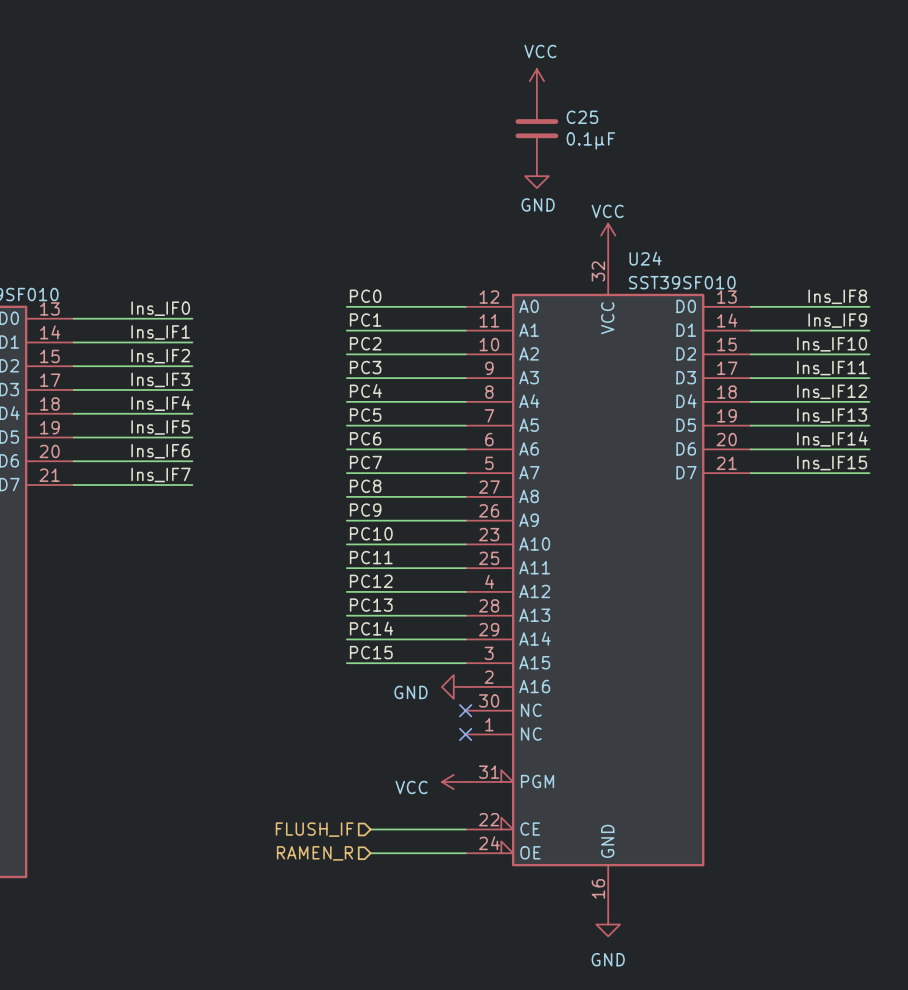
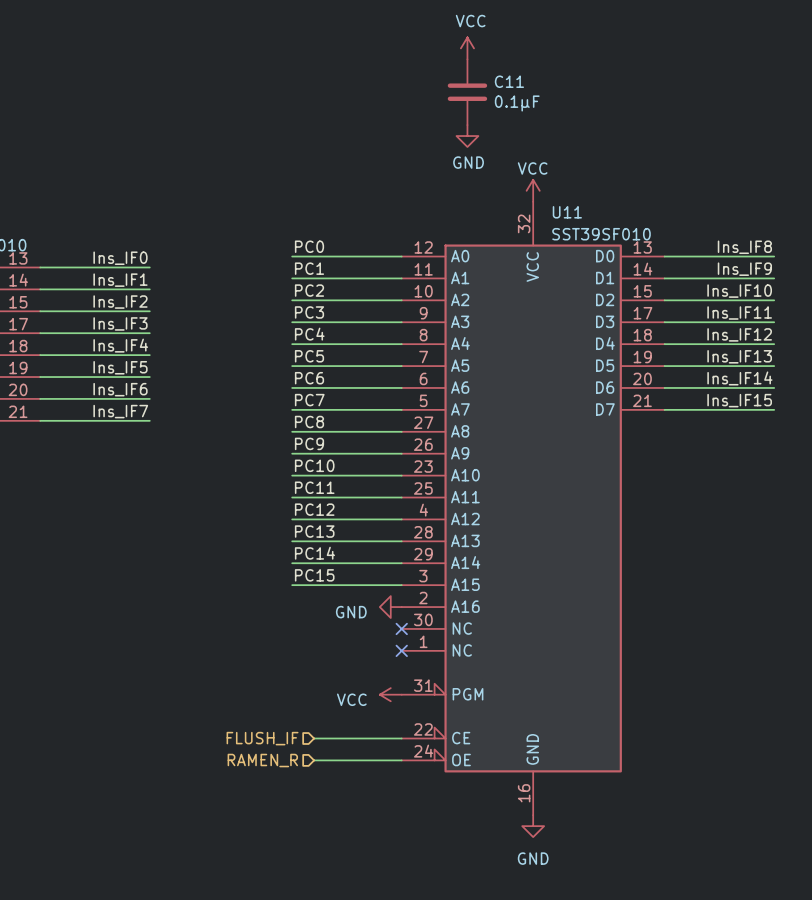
C25 name: C25 (582, 117) -> C11 (509, 81)
U24 name: U24 (645, 258) -> U11 (567, 212)

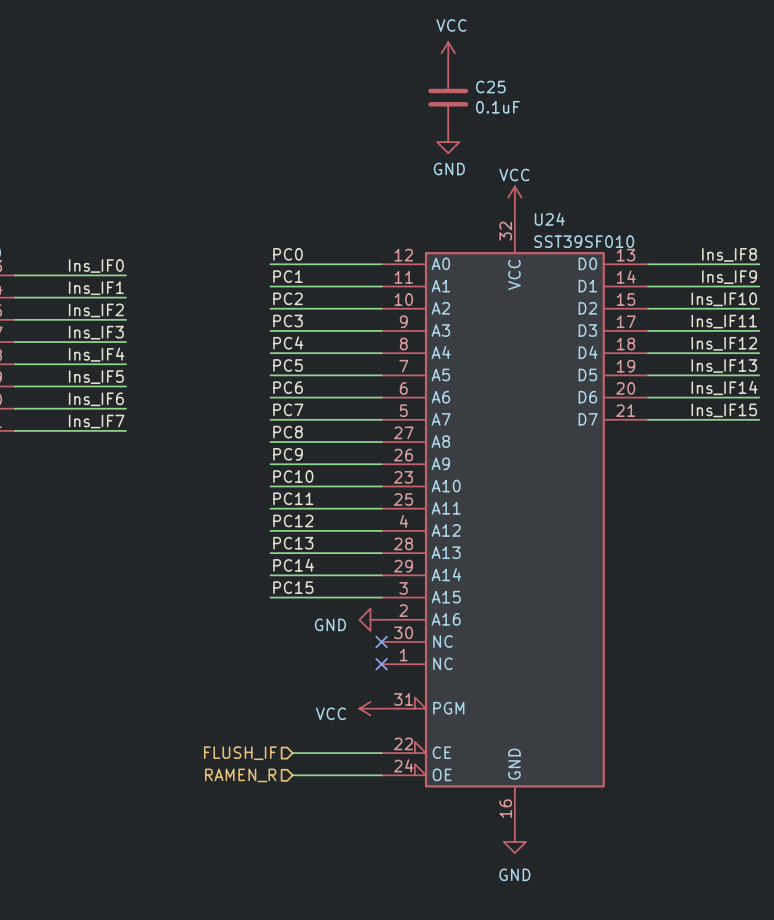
C11 name: C11 (509, 81) -> C25 (490, 87)
C11 value: 0.1μF (517, 103) -> 0.1uF (497, 107)
U11 name: U11 (567, 212) -> U24 (549, 219)

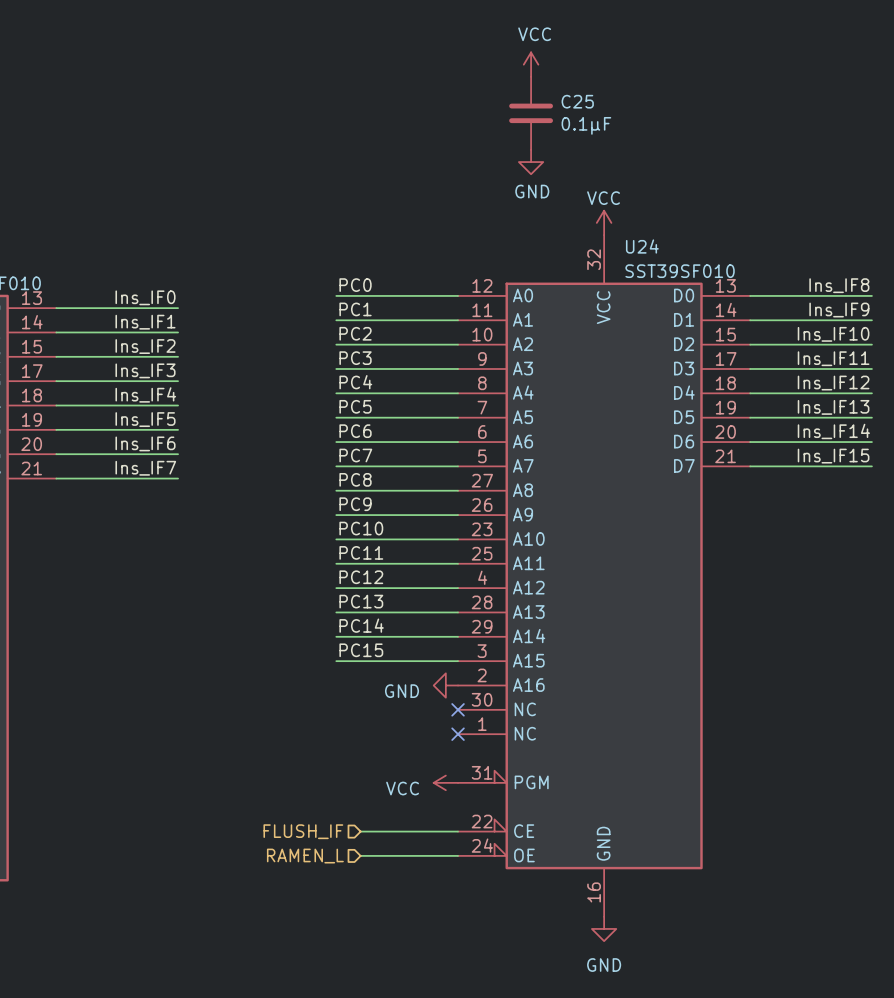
C25 value: 0.1uF (497, 107) -> 0.1μF (586, 125)
hierarchical label: RAMEN_R (240, 775) -> RAMEN_L (305, 856)

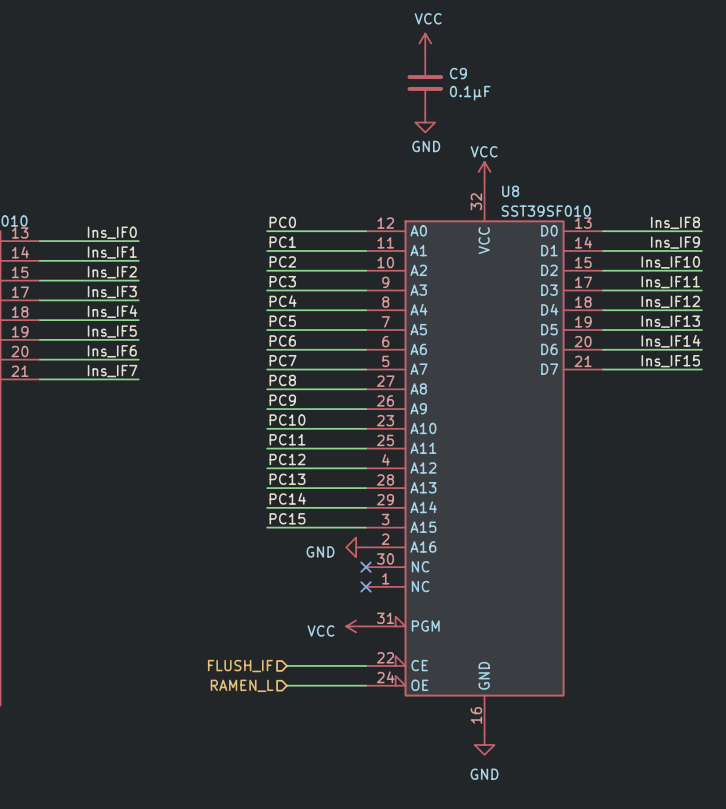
C25 name: C25 (577, 101) -> C9 (458, 73)
U24 name: U24 (642, 246) -> U8 (510, 191)

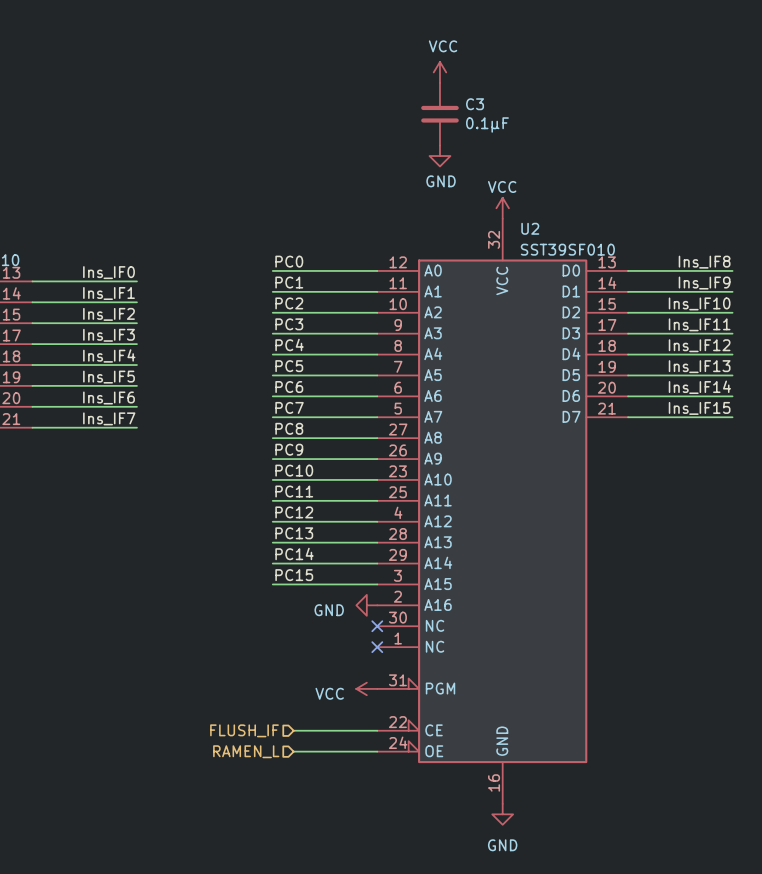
C9 name: C9 (458, 73) -> C3 (475, 104)
U8 name: U8 (510, 191) -> U2 (530, 228)

